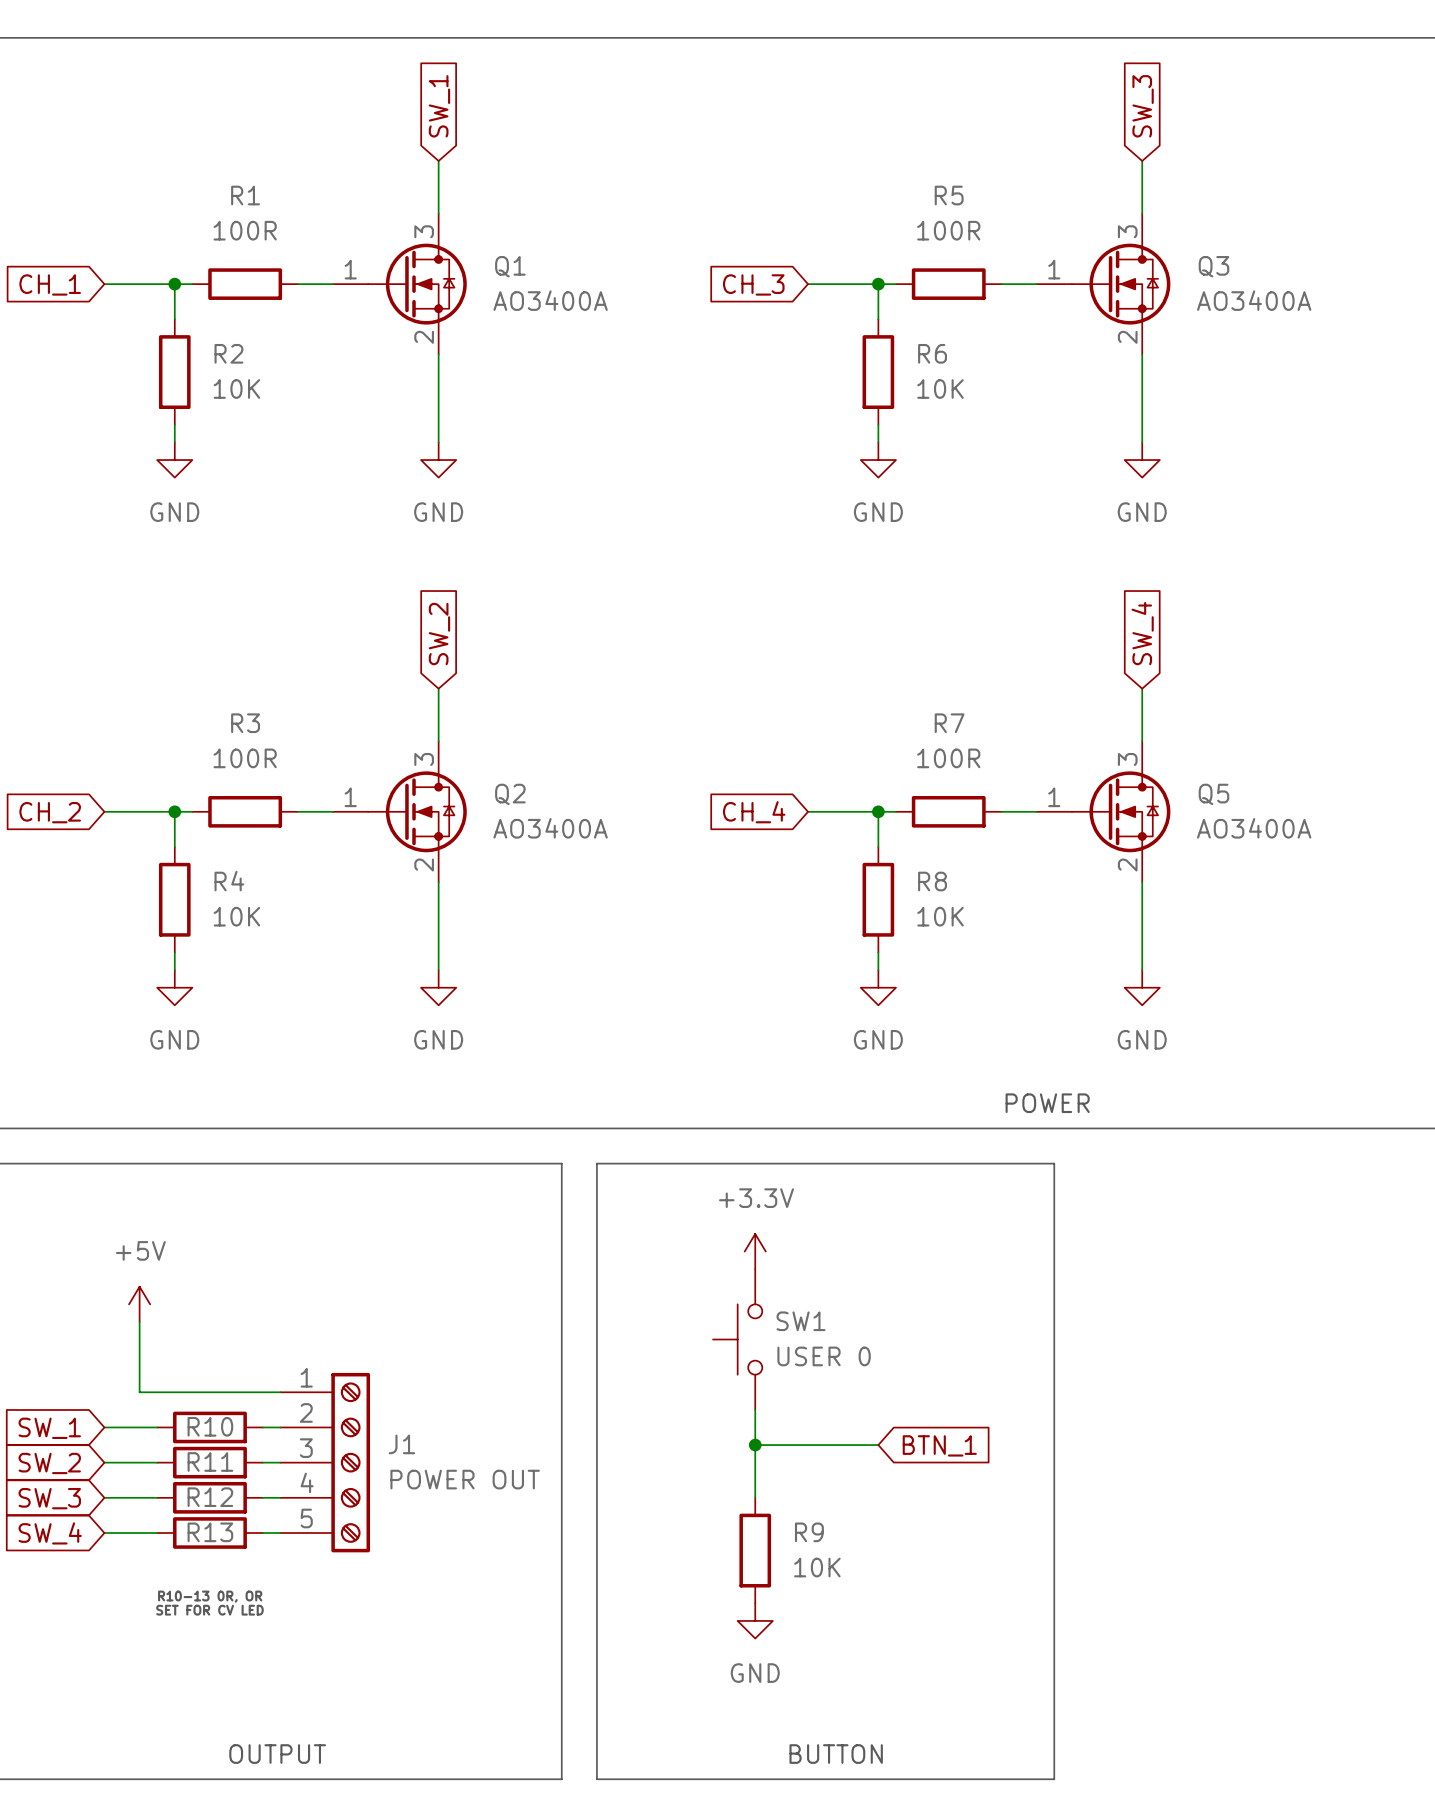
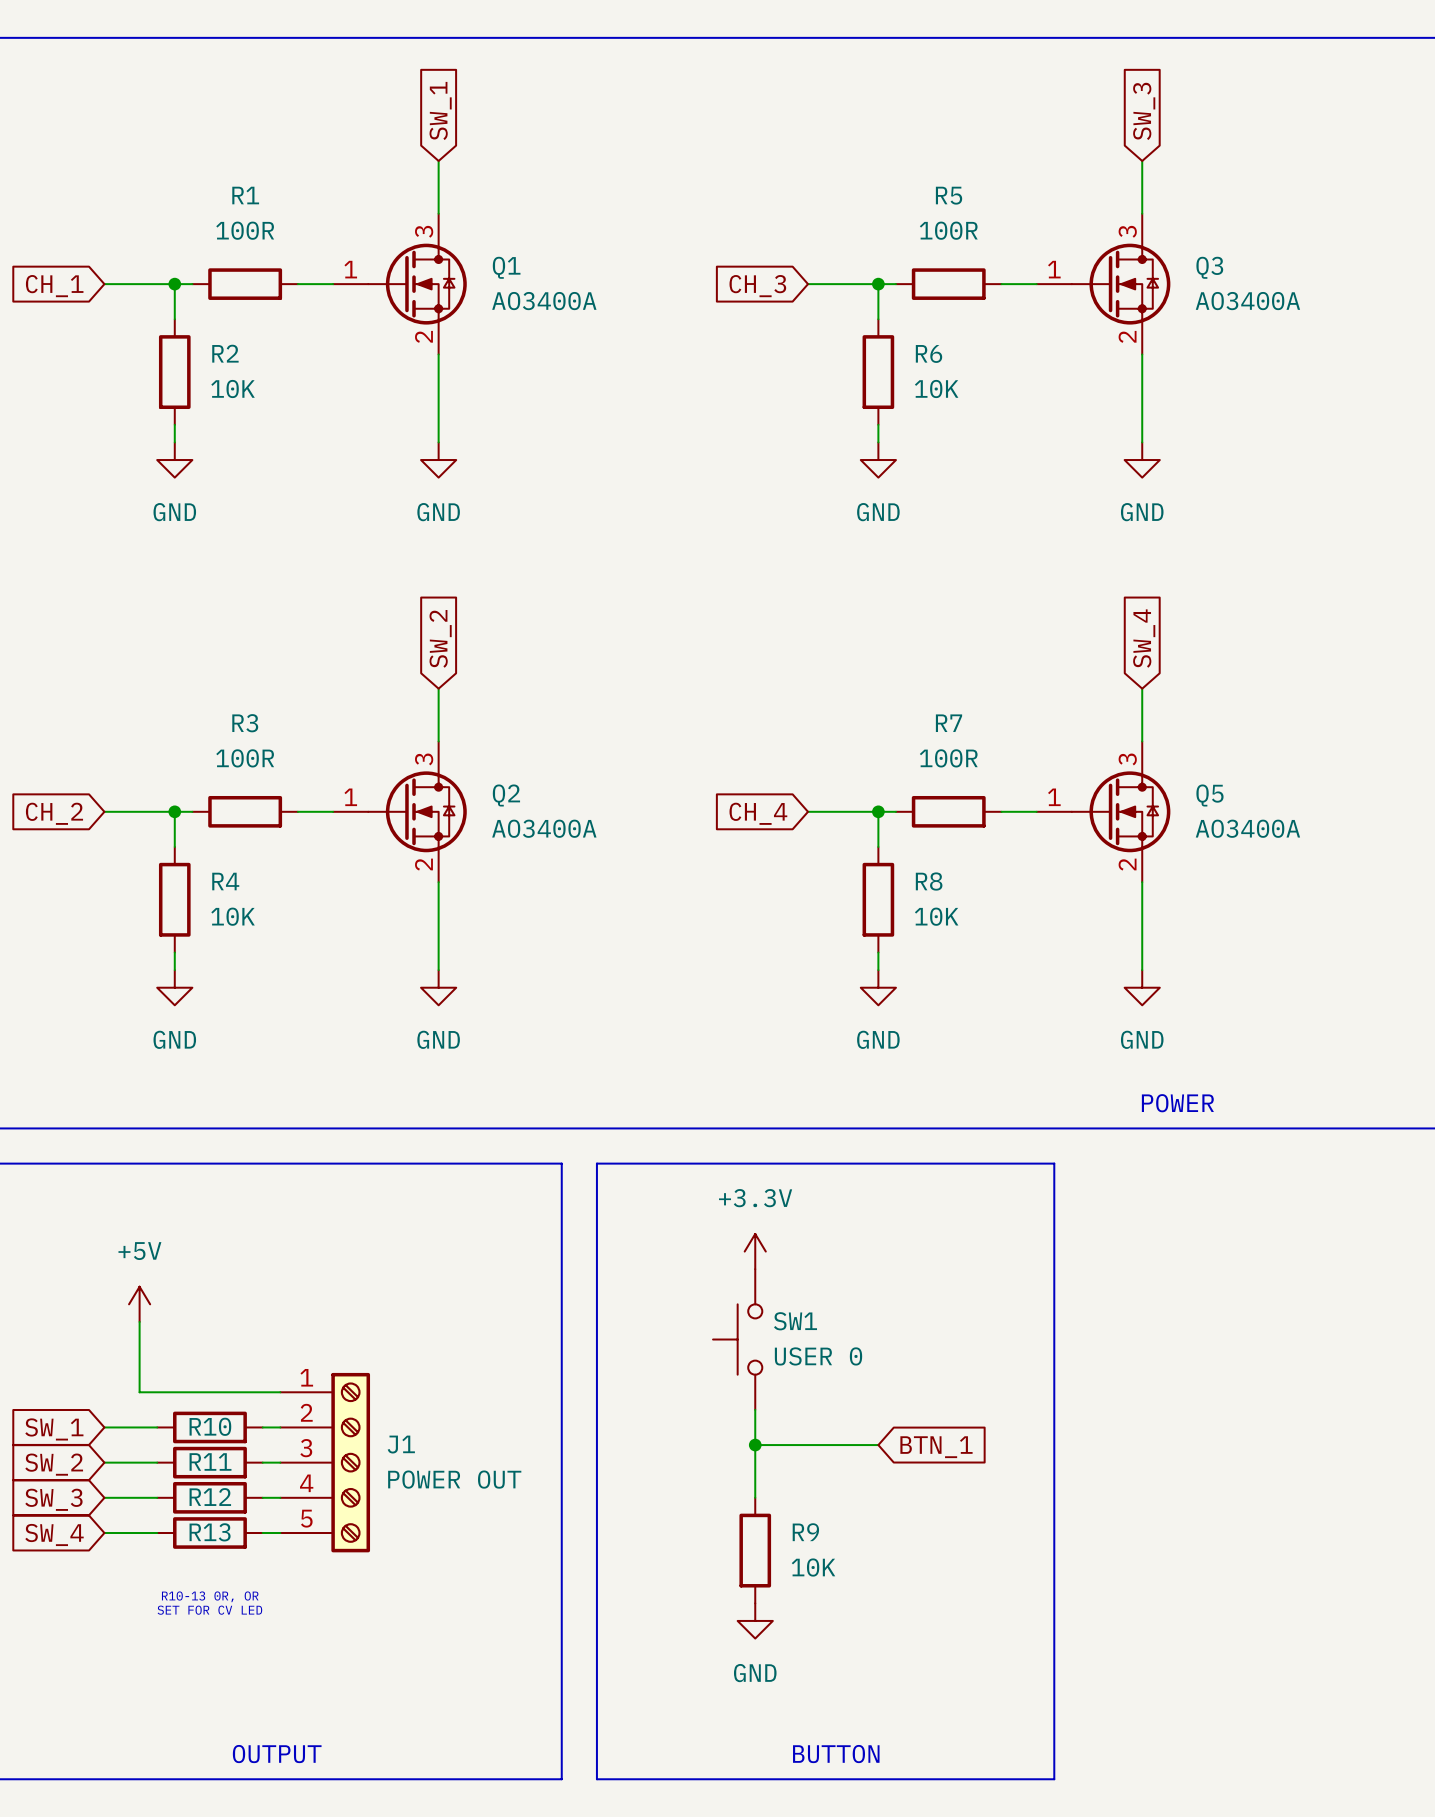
text position: POWER (1047, 1103) -> POWER (1177, 1103)

